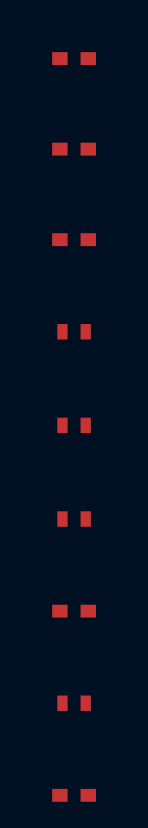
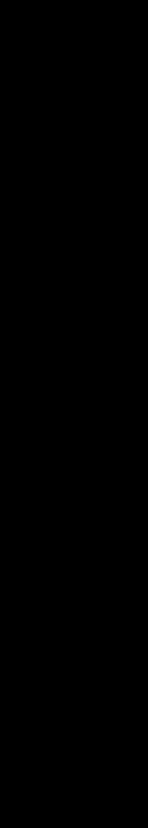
part: (74, 58) -> none
part: (74, 149) -> none
part: (74, 239) -> none
part: (74, 331) -> none
part: (74, 425) -> none
part: (74, 519) -> none
part: (74, 611) -> none
part: (74, 703) -> none
part: (74, 795) -> none

